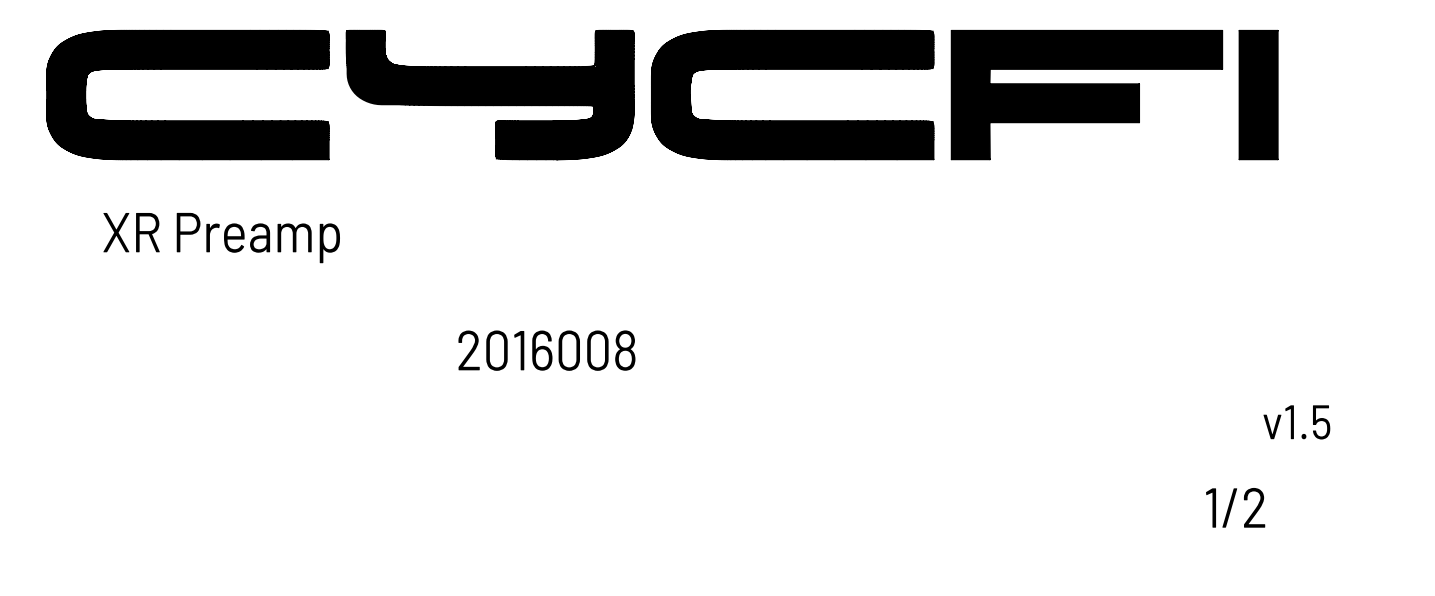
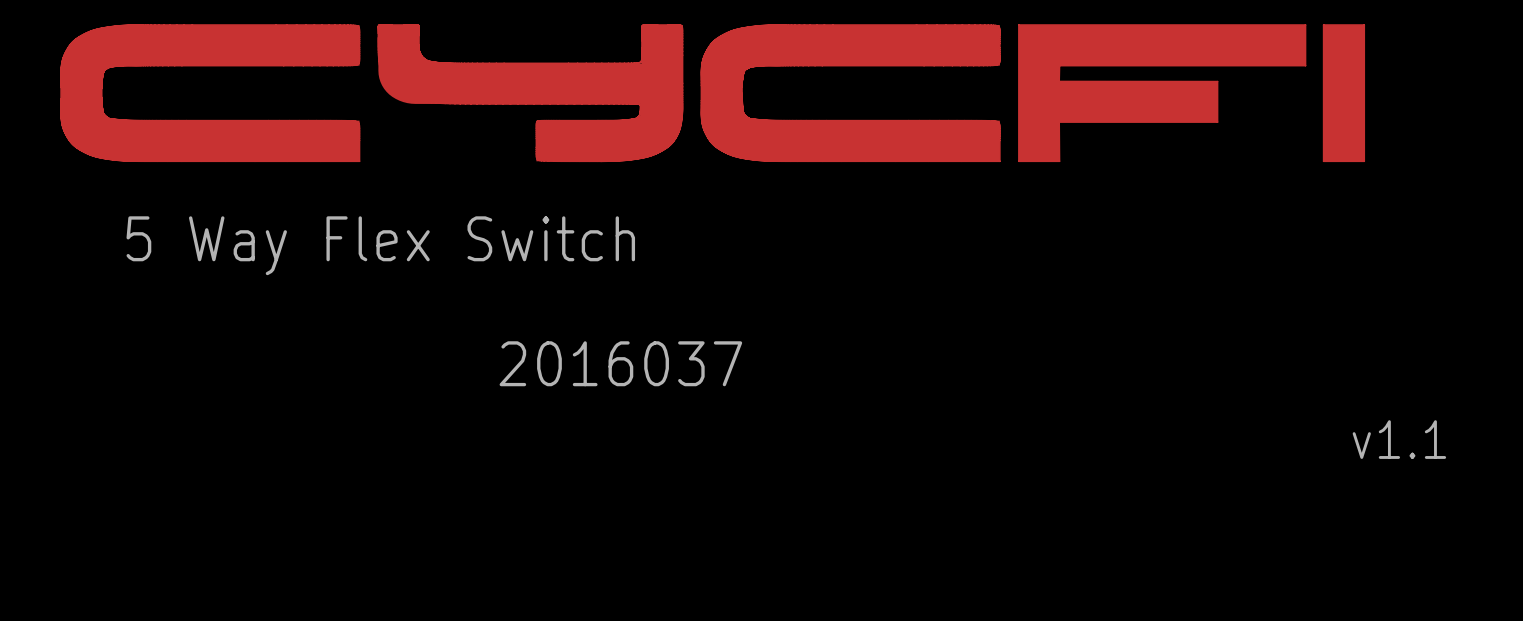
text: XR Preamp (221, 238) -> 5 Way Flex Switch (380, 245)
text: 2016008 (546, 350) -> 2016037 (620, 363)
text: v1.5 (1296, 422) -> v1.1 (1399, 439)
text: 1/2 (1235, 507) -> none

